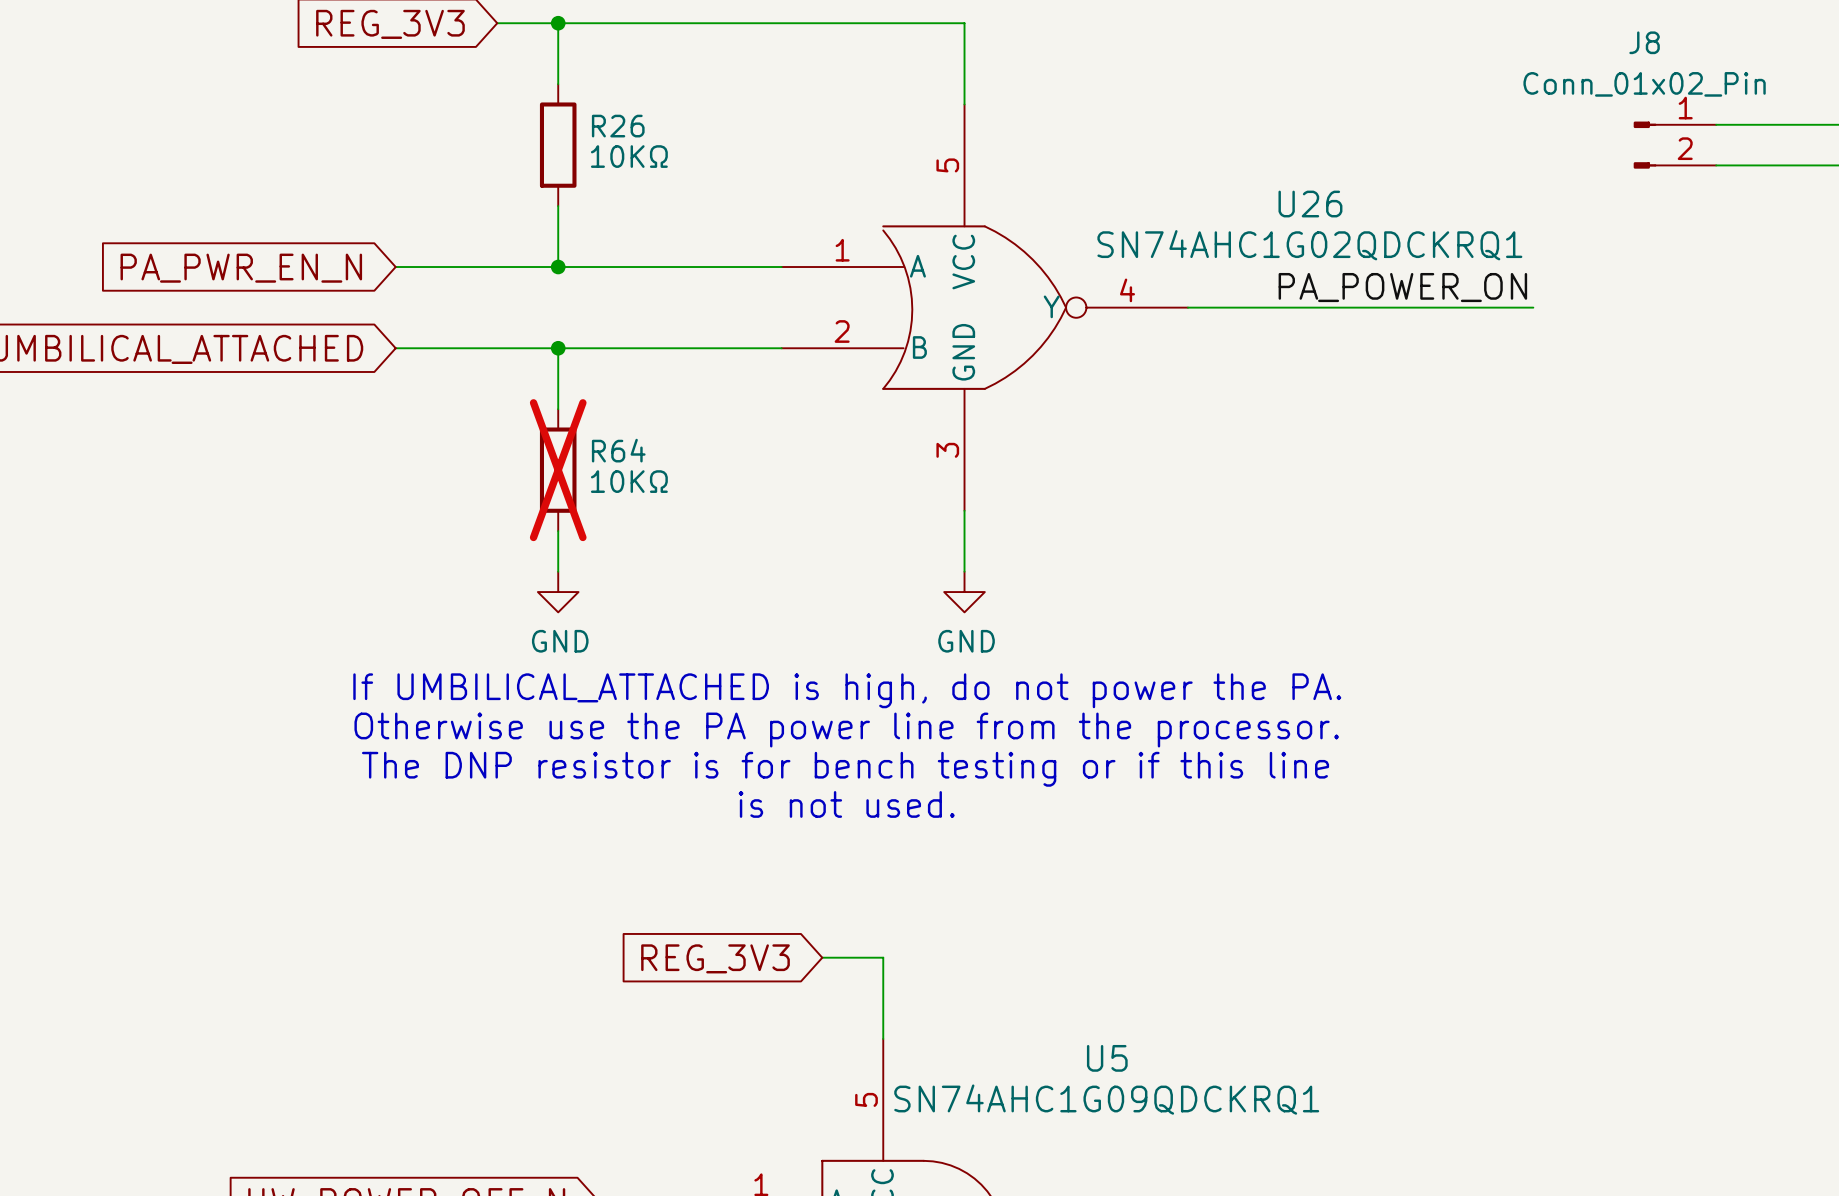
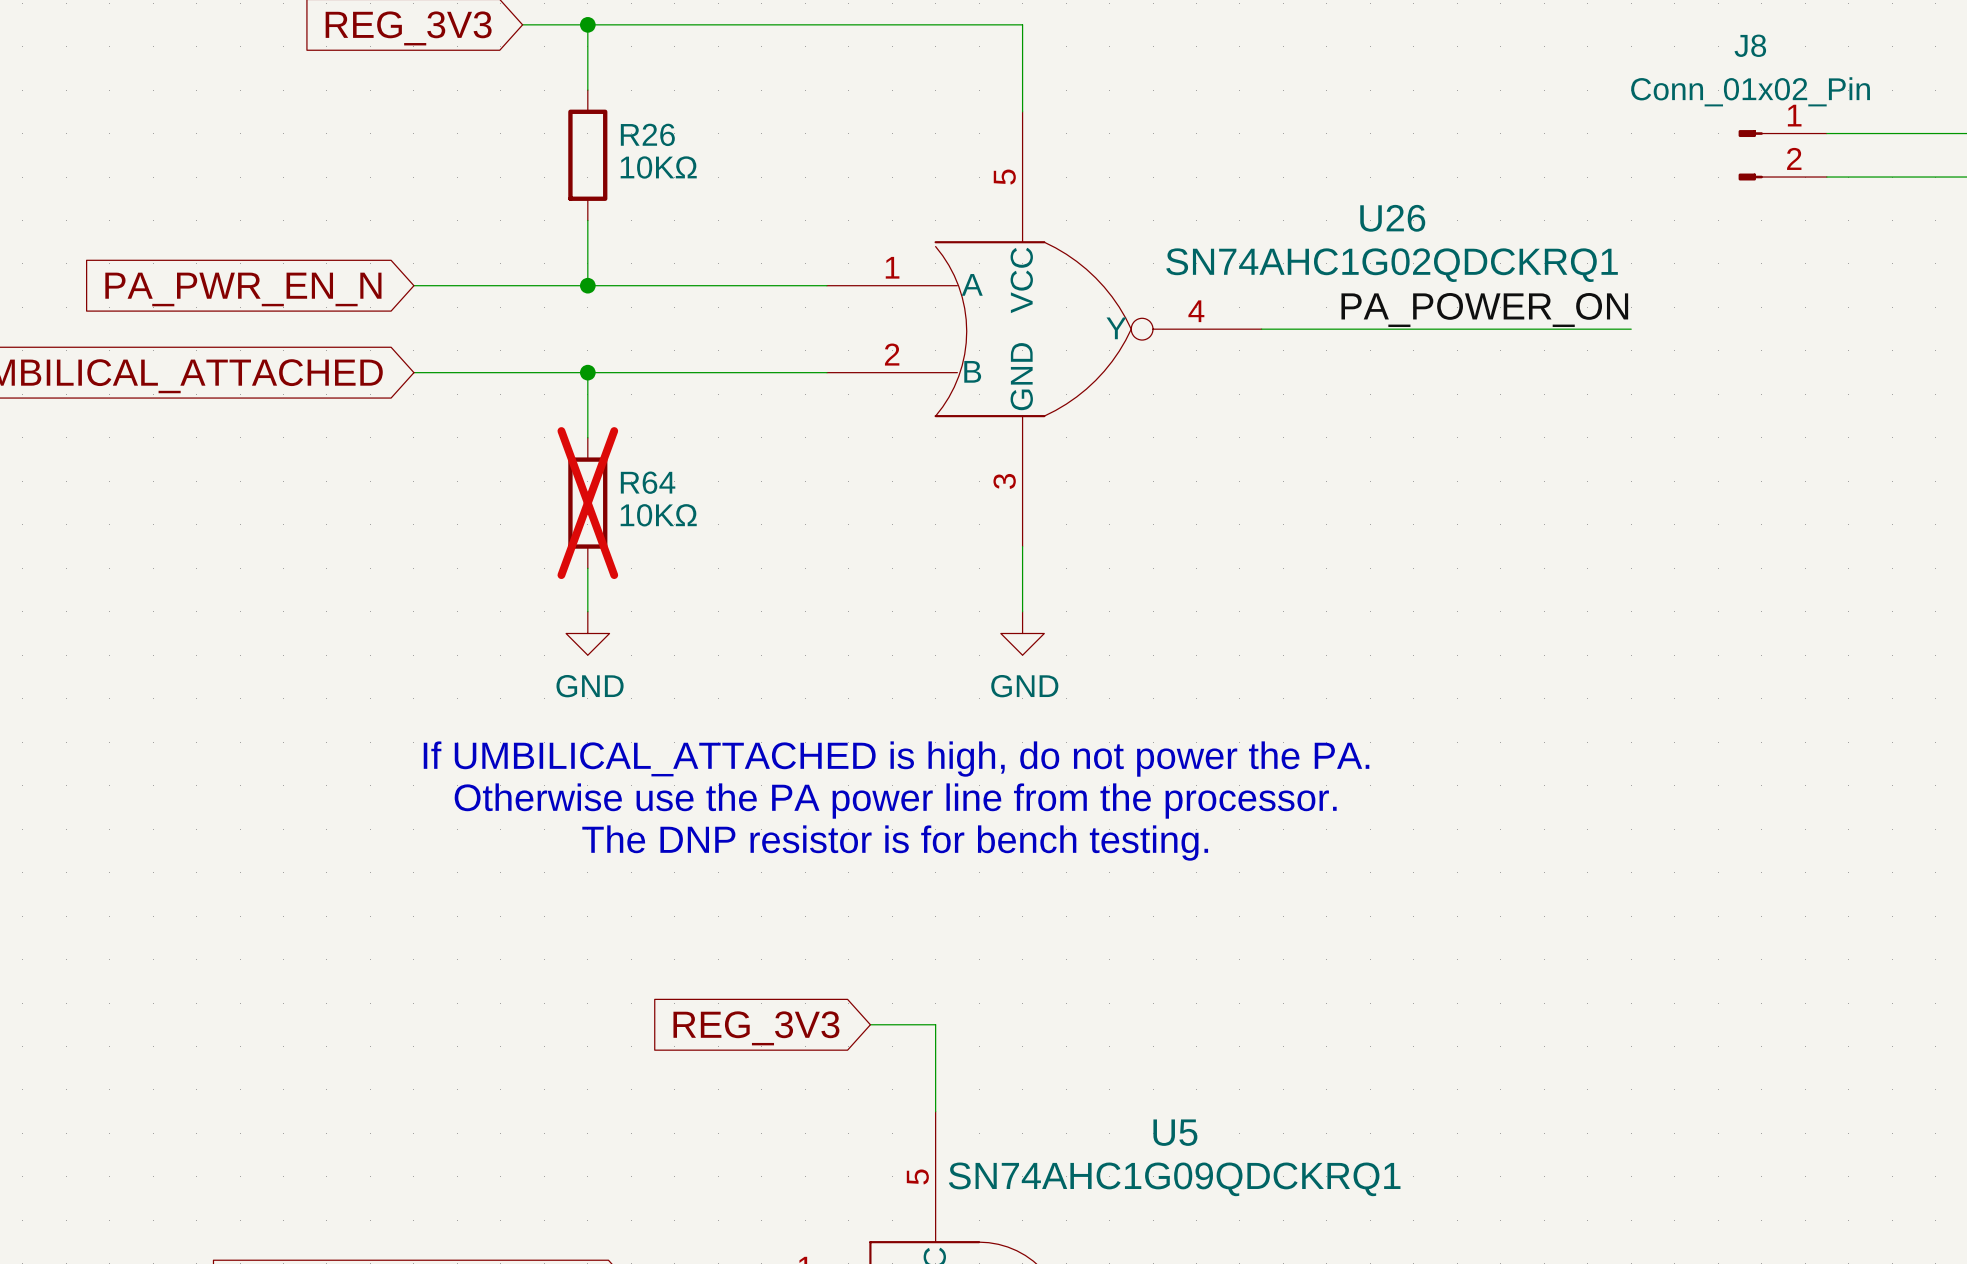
text position: If UMBILICAL_ATTACHED is high, do not power the PA. (847, 690) -> If UMBILICAL_ATTACHED is high, do not power the PA. (896, 759)
text position: Otherwise use the PA power line from the processor. (846, 730) -> Otherwise use the PA power line from the processor. (895, 801)
text: The DNP resistor is for bench testing or if this line (845, 769) -> The DNP resistor is for bench testing. (895, 843)
text: is not used. (846, 804) -> none

